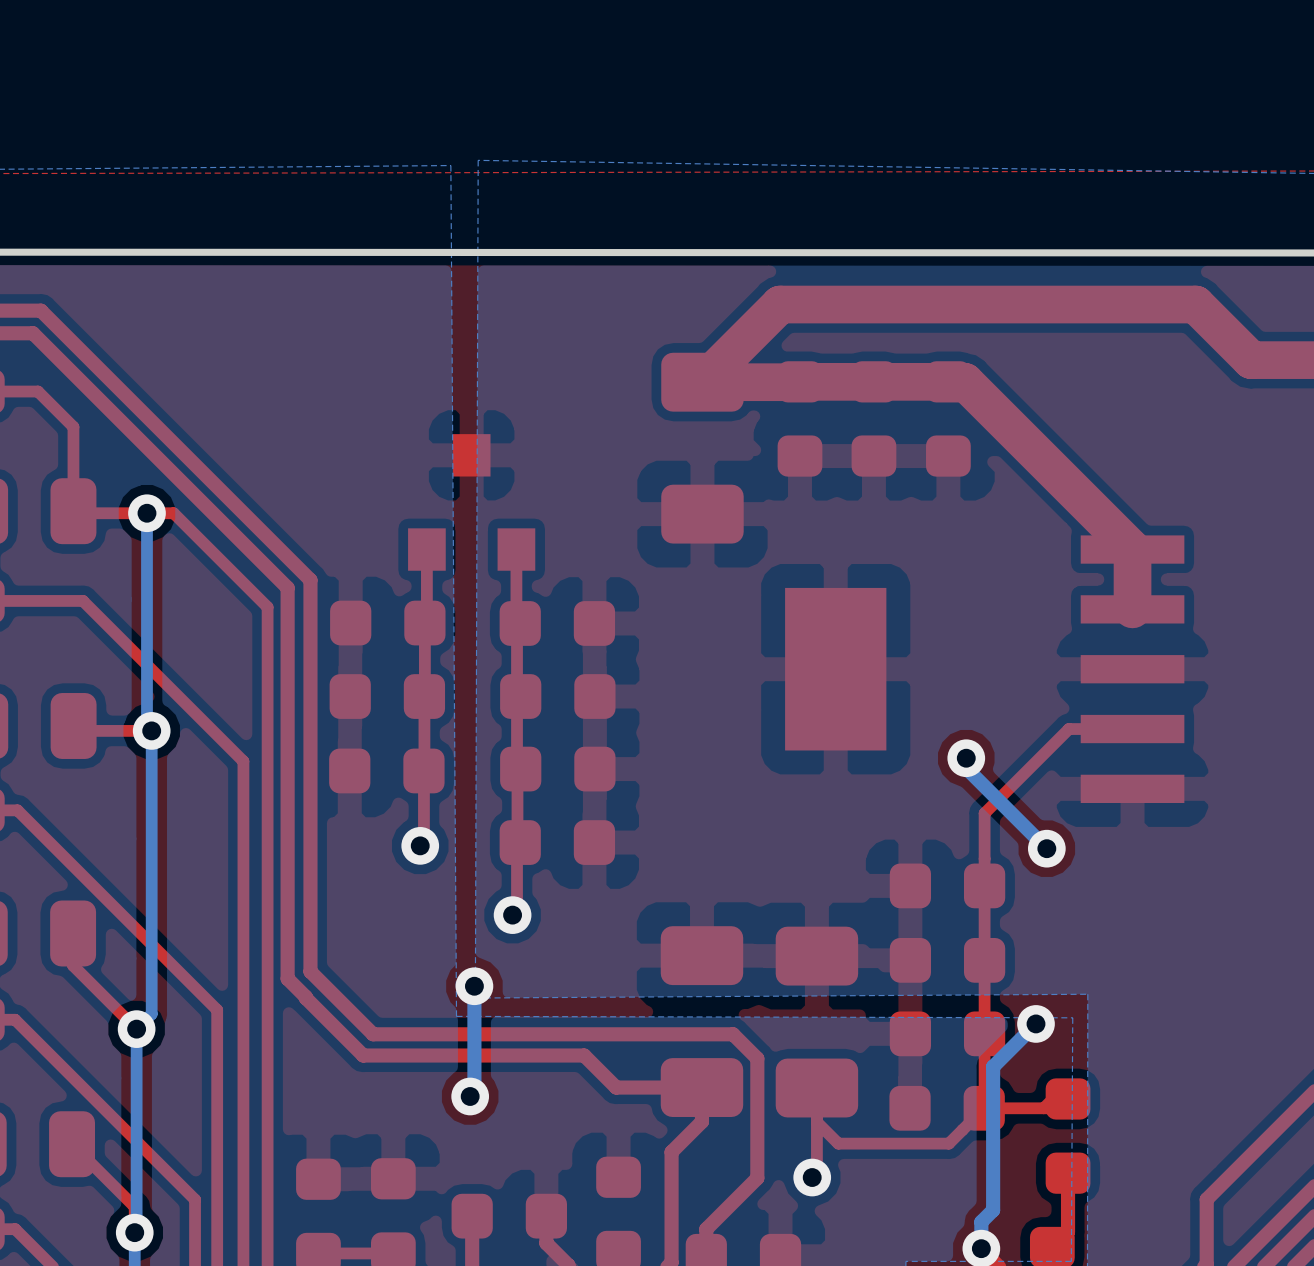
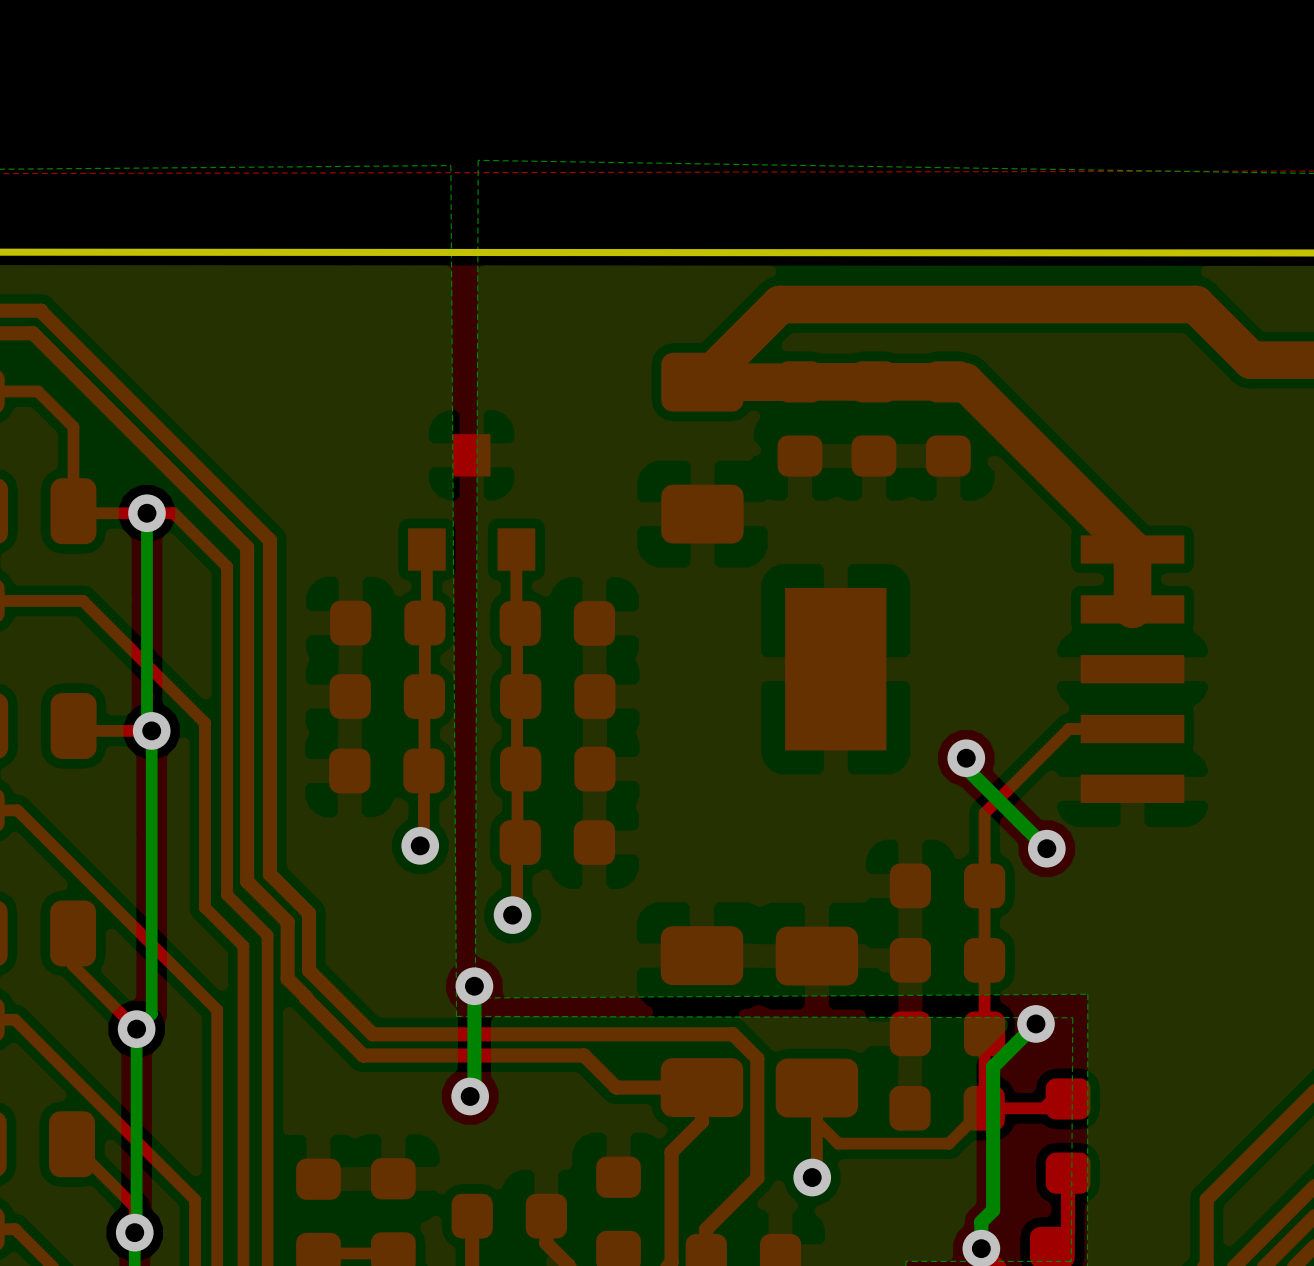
top track: (40, 310) (310, 580) (310, 971) (373, 1034) -> (40, 311) (269, 540) (269, 874) (309, 913) (309, 970) (372, 1034)
top track: (247, 547) (287, 587) (287, 921) -> (247, 547) (247, 881) (287, 921)
top track: (227, 566) (267, 607) (267, 935) -> (227, 566) (227, 894) (267, 935)
top track: (204, 722) (243, 761) (243, 946) -> (204, 722) (204, 907) (243, 946)

